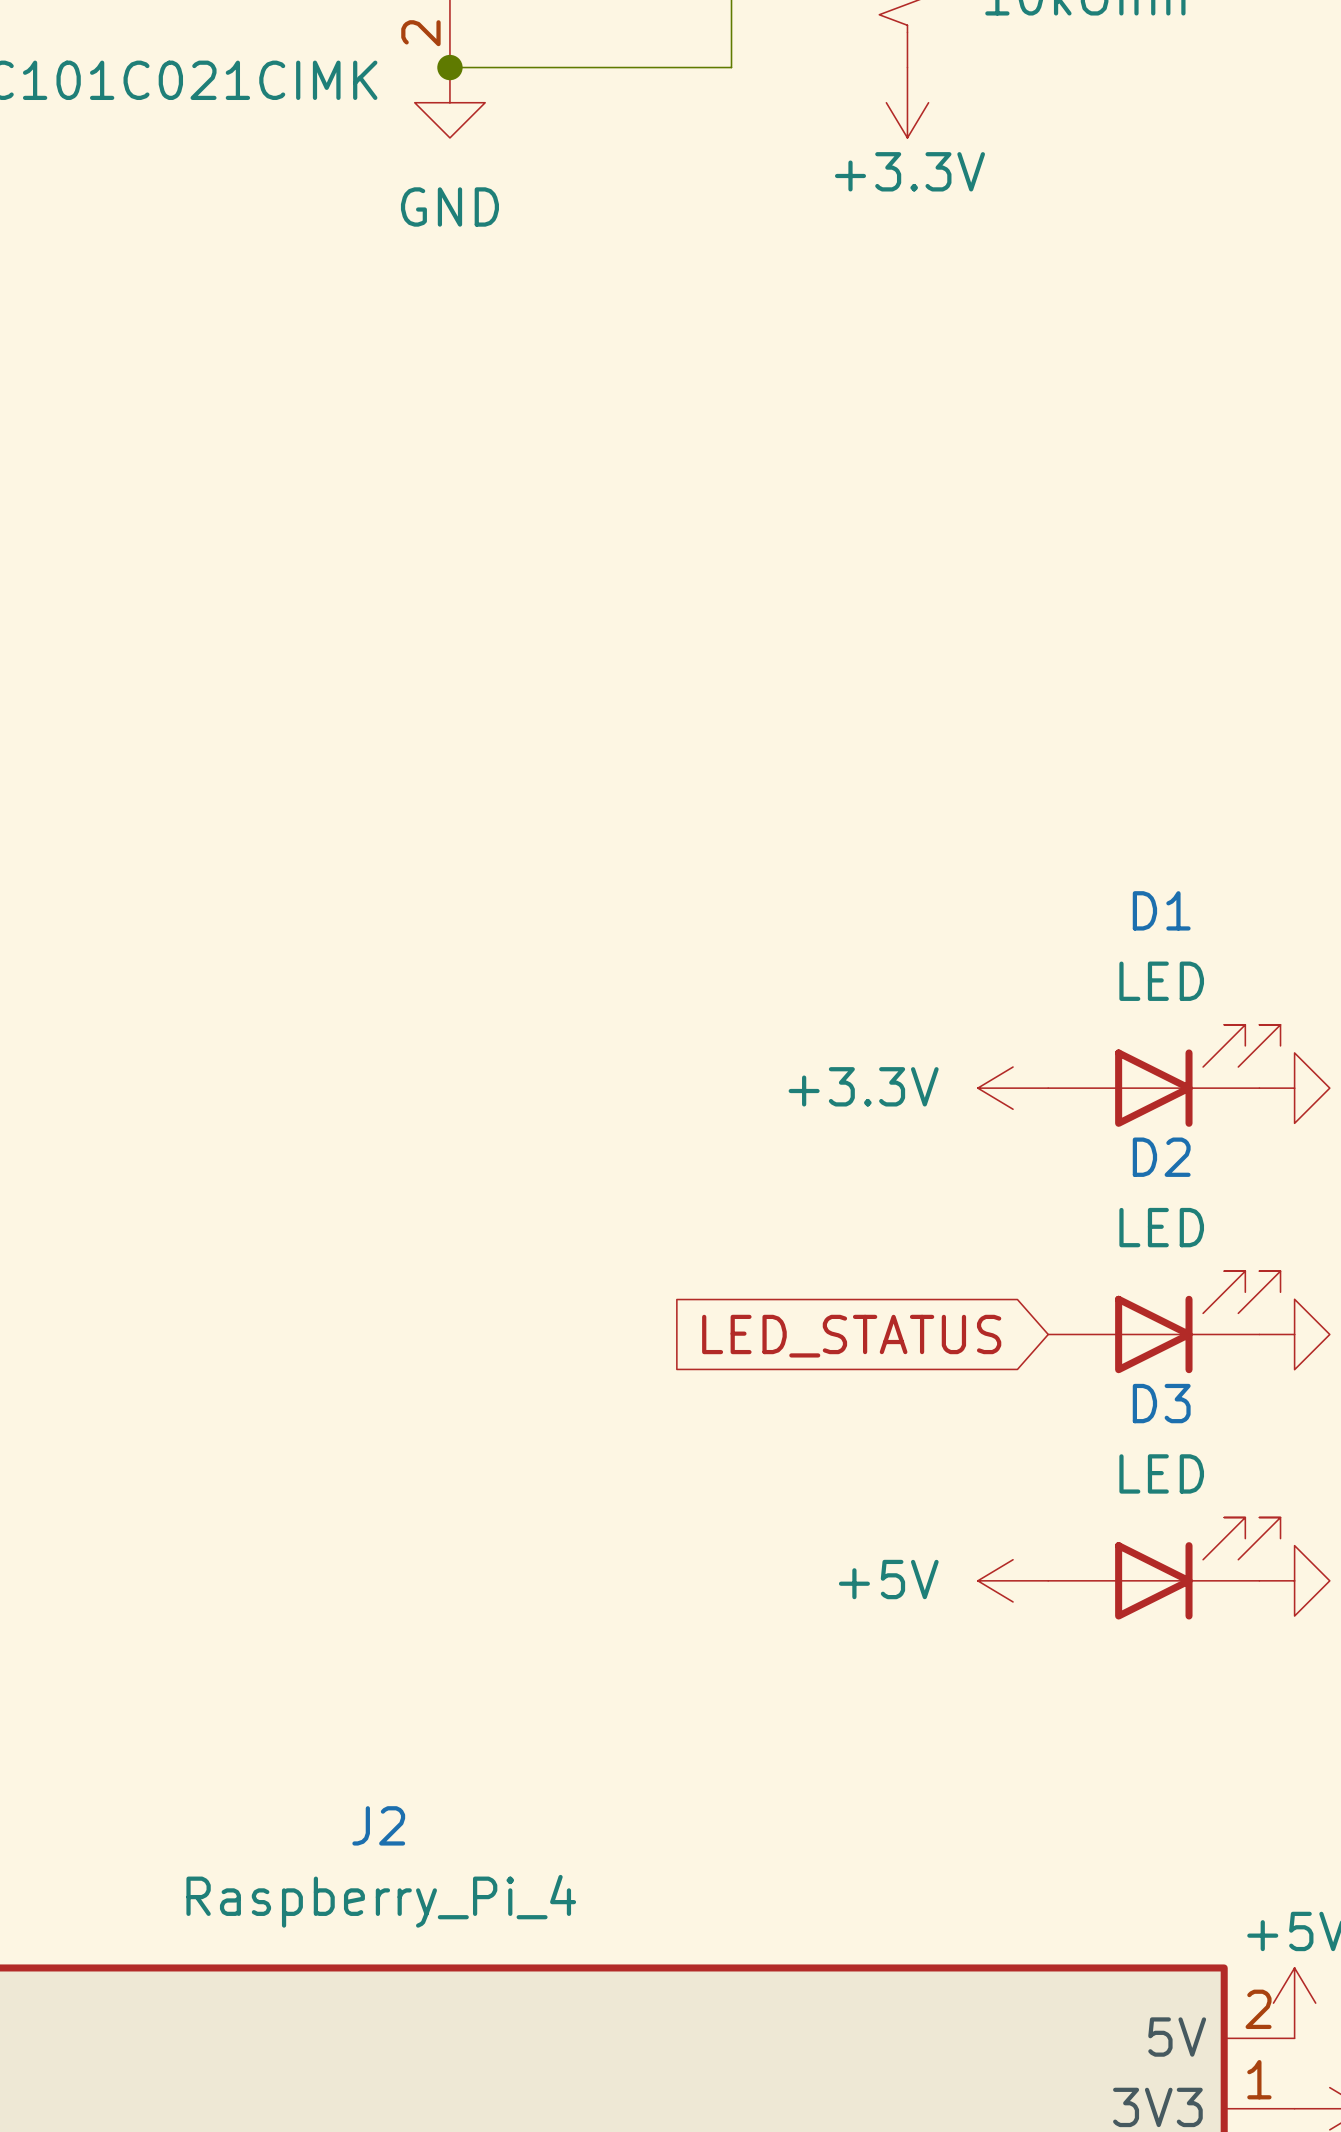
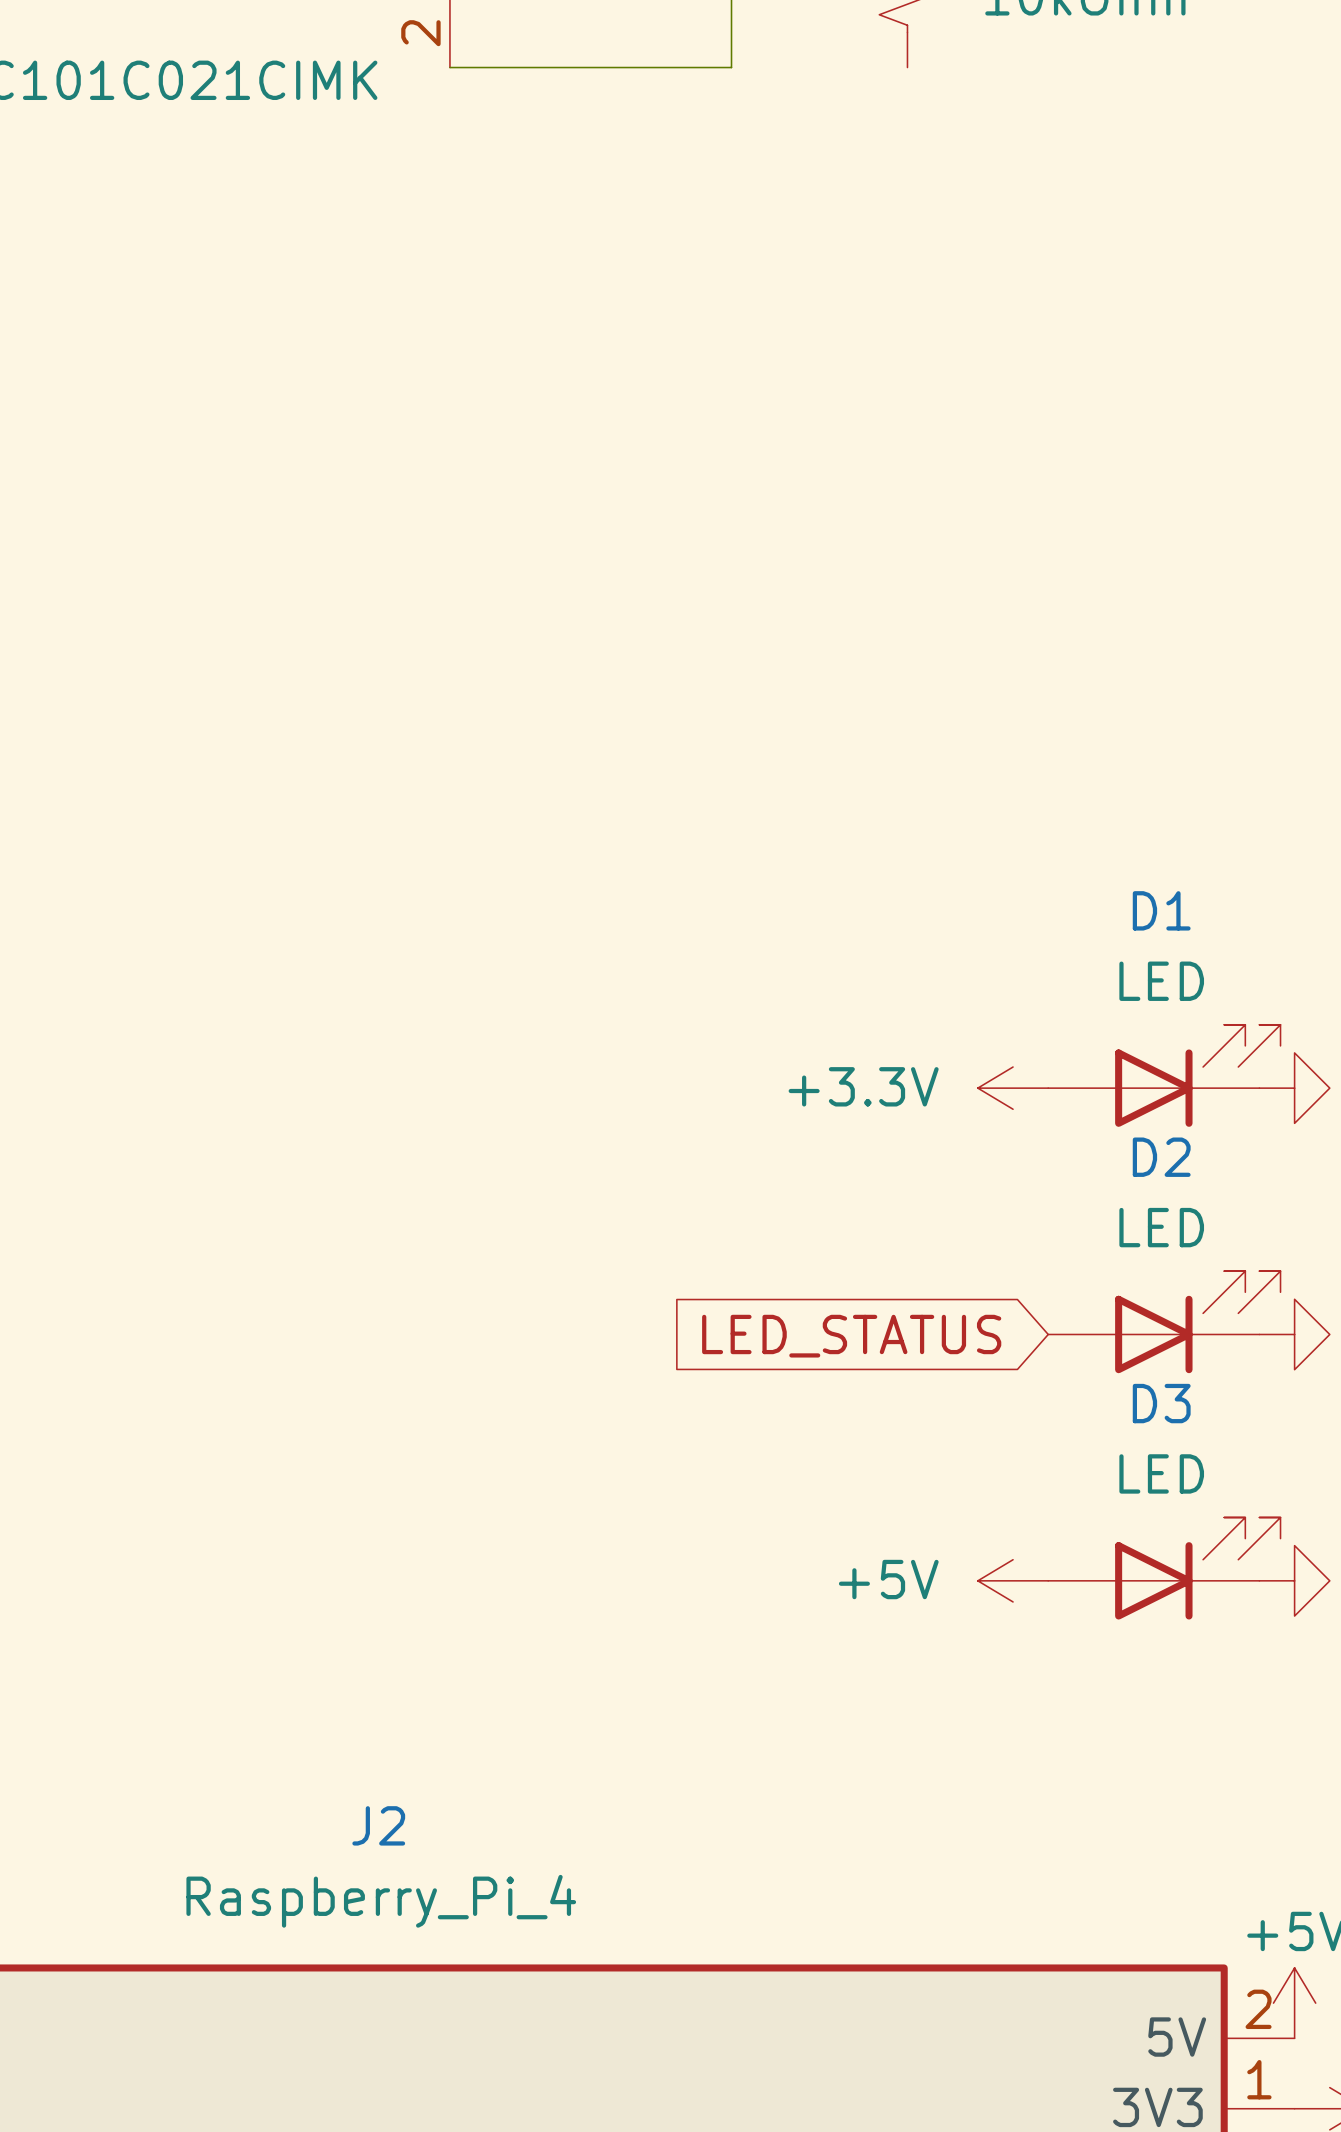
junction: (449, 67) -> none
power symbol: GND (449, 102) -> none
power symbol: +3.3V (907, 102) -> none

